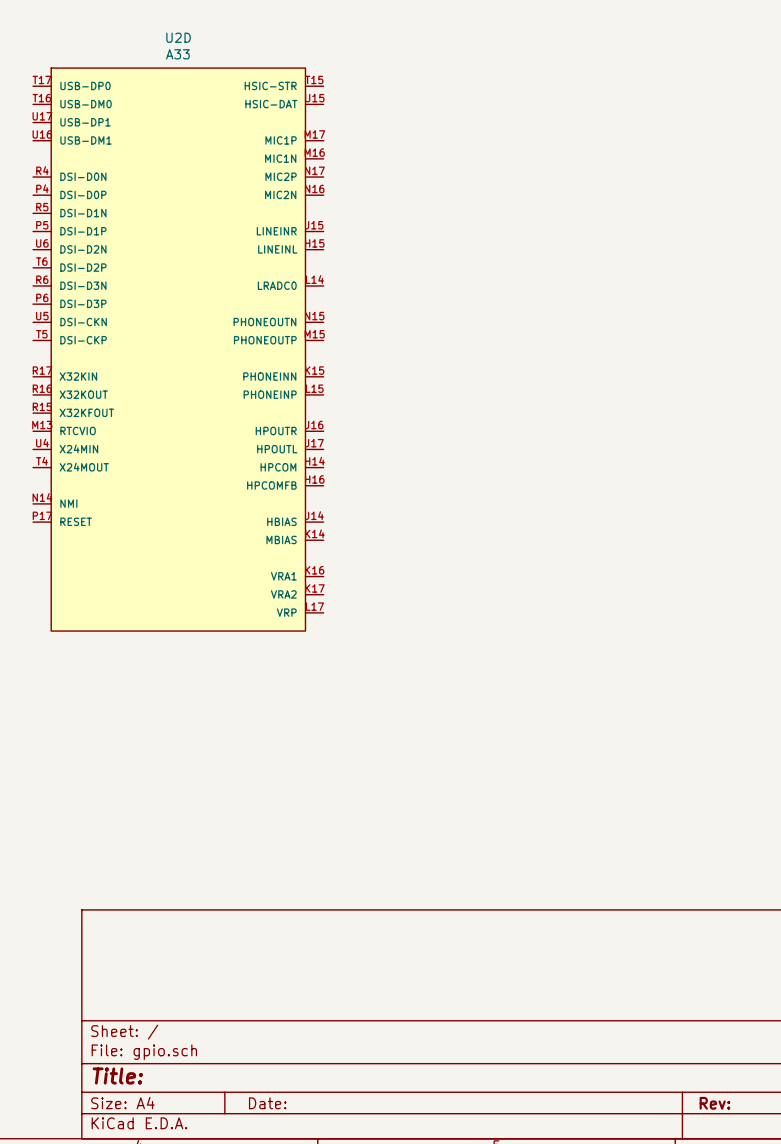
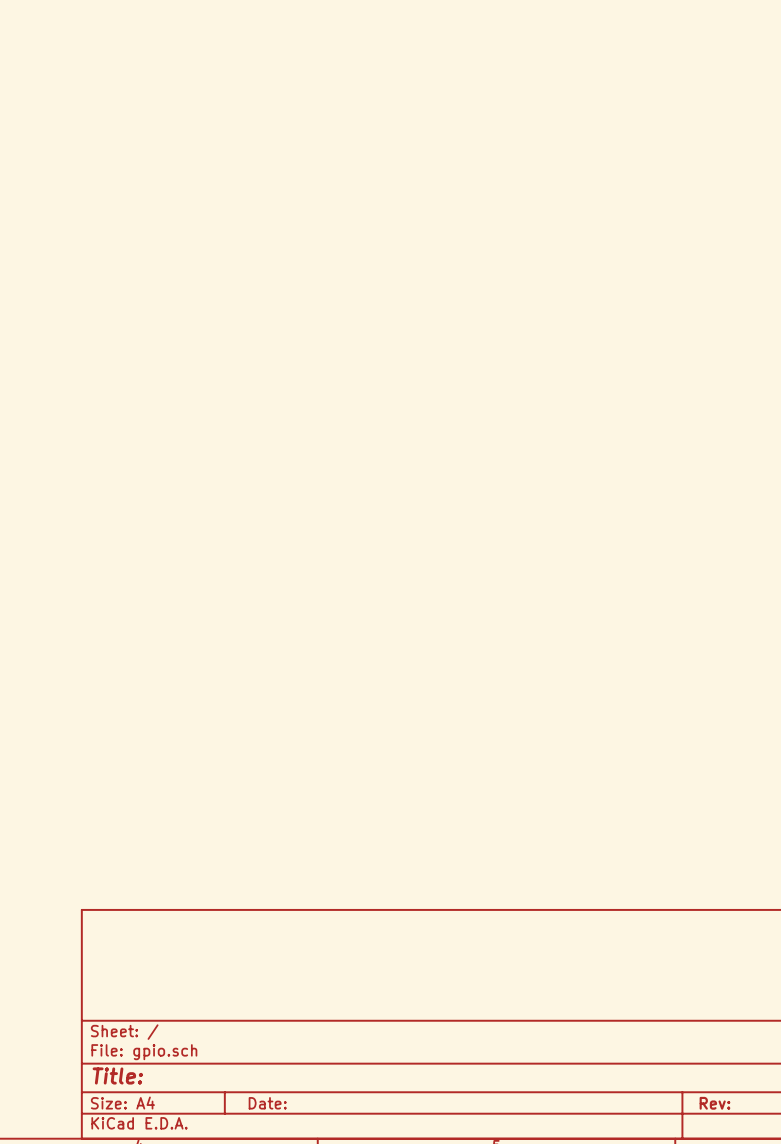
U2D: A33 (178, 349) -> none

